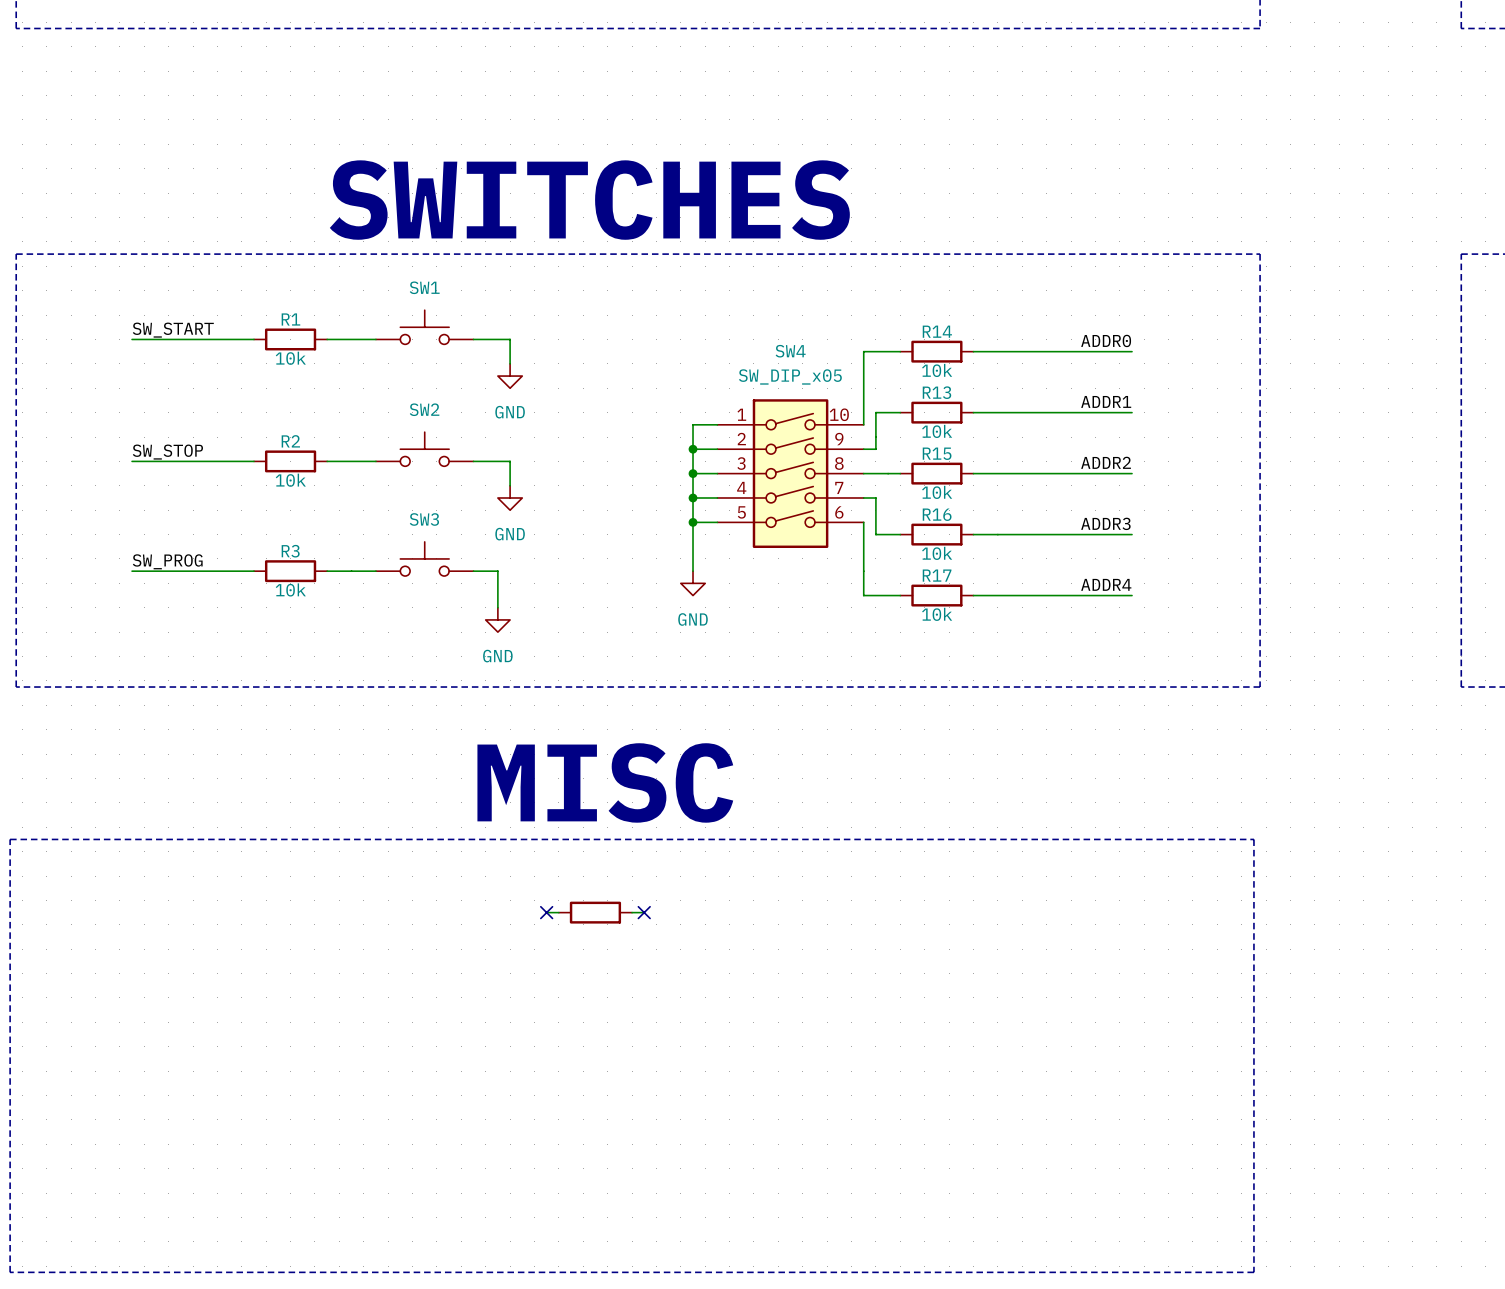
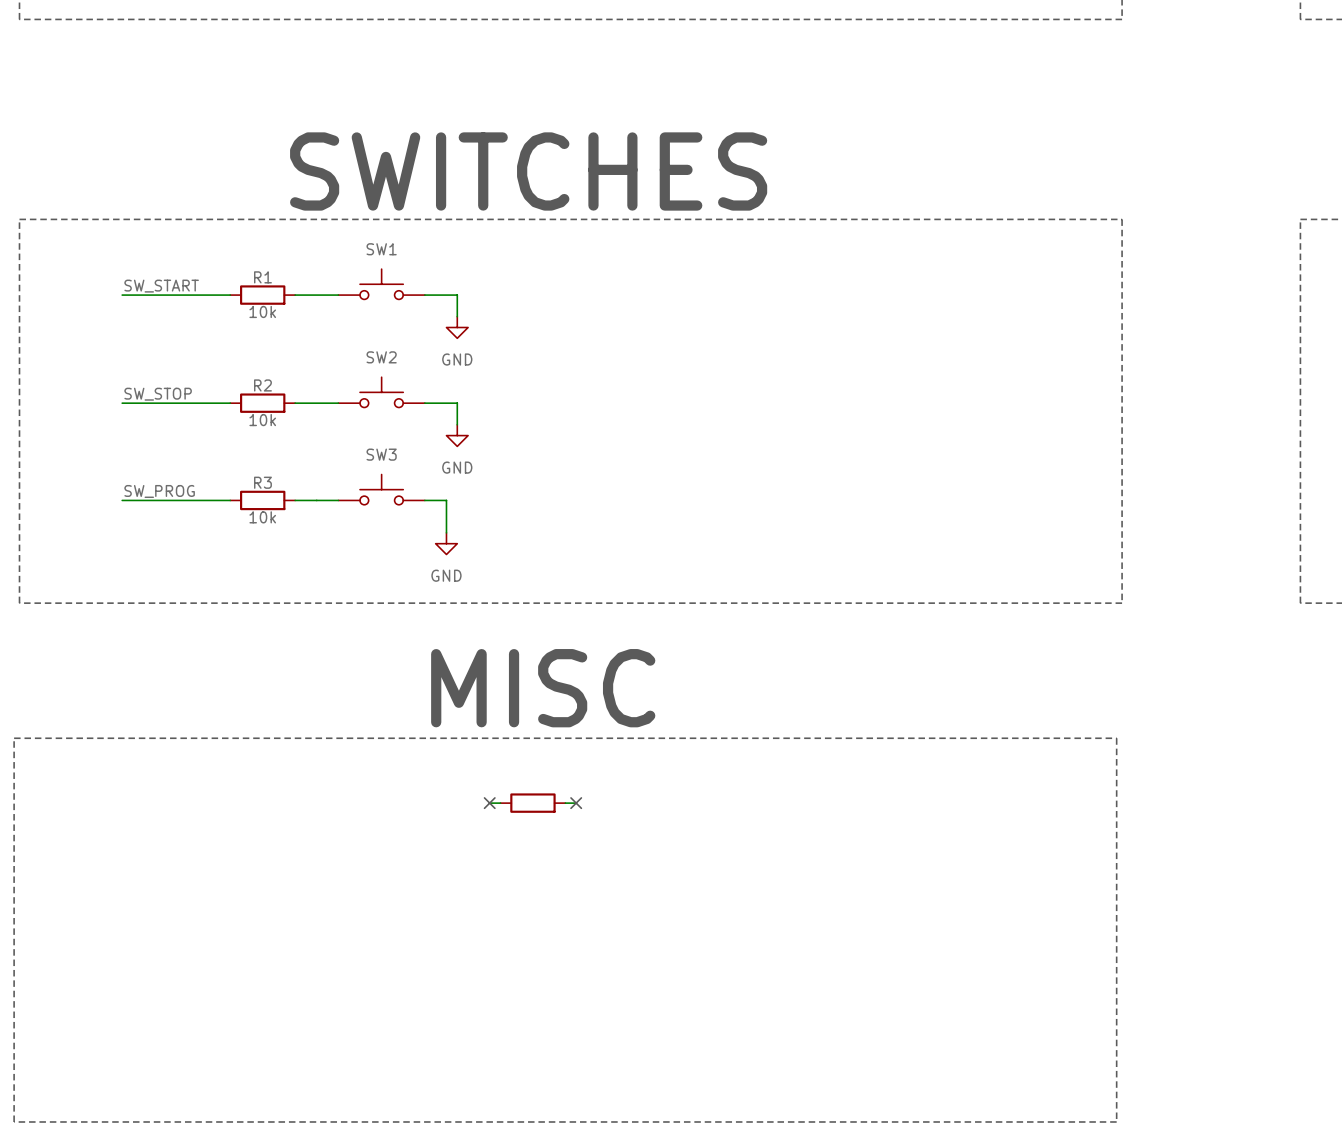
label: ADDR0 (1106, 340) -> none
wire: (900, 351) (863, 351) (863, 424) -> none
R14: 10k (936, 351) -> none
wire: (973, 351) (1132, 351) -> none
label: ADDR1 (1106, 401) -> none
wire: (900, 412) (875, 412) (875, 449) (863, 449) -> none
R13: 10k (936, 412) -> none
wire: (973, 412) (1132, 412) -> none
wire: (717, 424) (693, 424) (693, 571) -> none
wire: (693, 449) (717, 449) -> none
junction: (693, 449) -> none
label: ADDR2 (1106, 462) -> none
wire: (693, 473) (717, 473) -> none
junction: (693, 473) -> none
SW4: SW_DIP_x05 (790, 473) -> none
wire: (863, 473) (900, 473) -> none
R15: 10k (936, 473) -> none
wire: (973, 473) (1132, 473) -> none
wire: (693, 497) (717, 497) -> none
junction: (693, 497) -> none
wire: (863, 497) (875, 497) (875, 534) (900, 534) -> none
wire: (693, 522) (717, 522) -> none
junction: (693, 522) -> none
wire: (863, 522) (863, 595) (900, 595) -> none
label: ADDR3 (1105, 523) -> none
R16: 10k (936, 534) -> none
wire: (973, 534) (1132, 534) -> none
power symbol: GND (693, 583) -> none
label: ADDR4 (1106, 584) -> none
R17: 10k (936, 595) -> none
wire: (973, 595) (1132, 595) -> none

